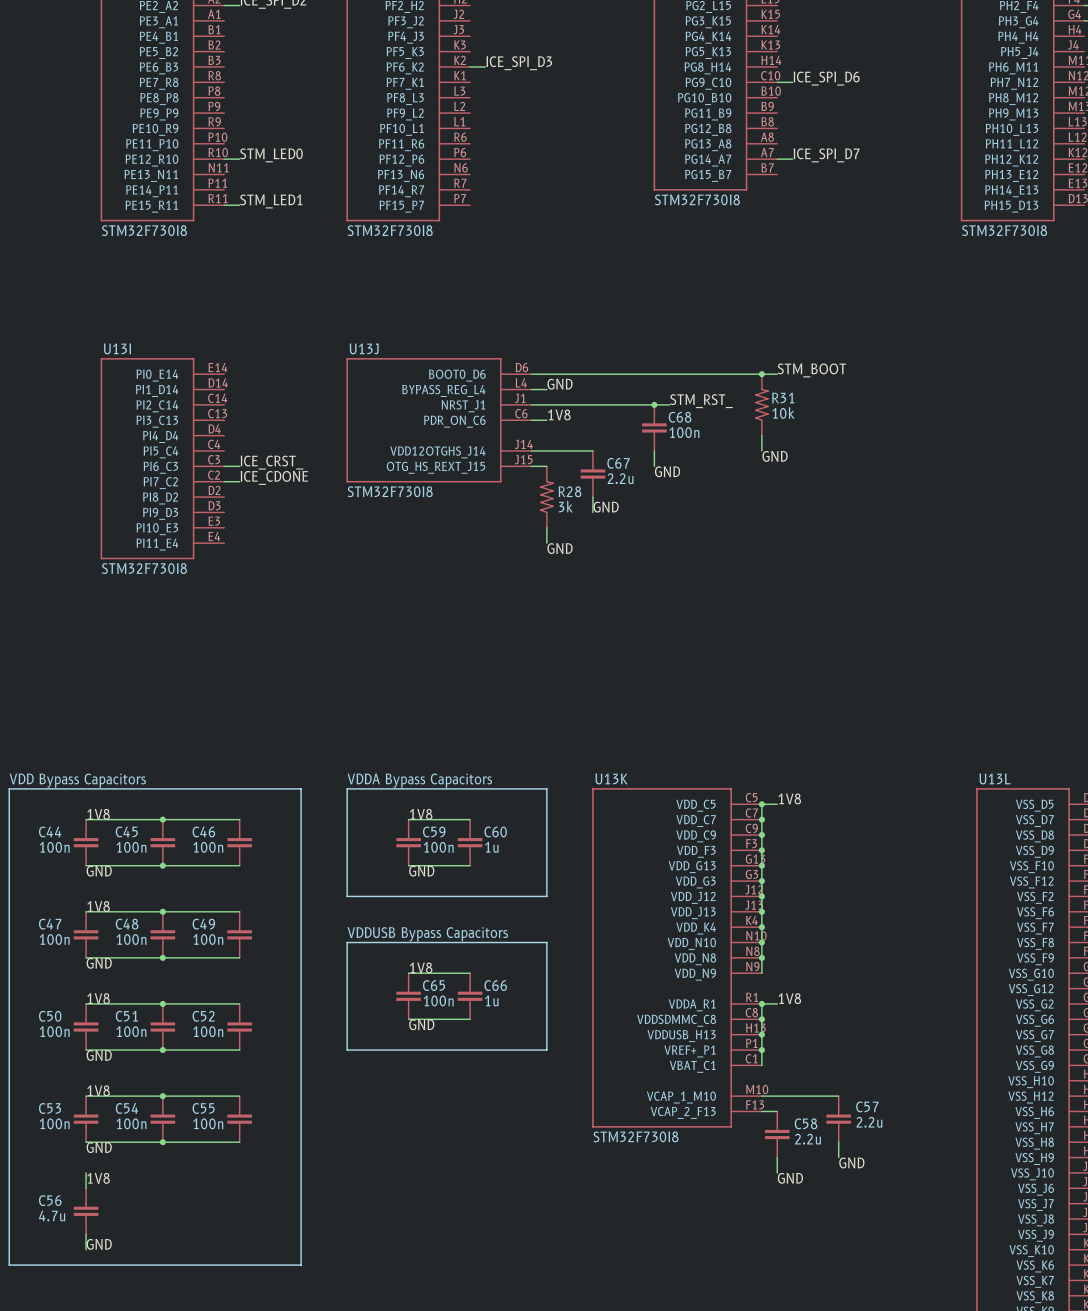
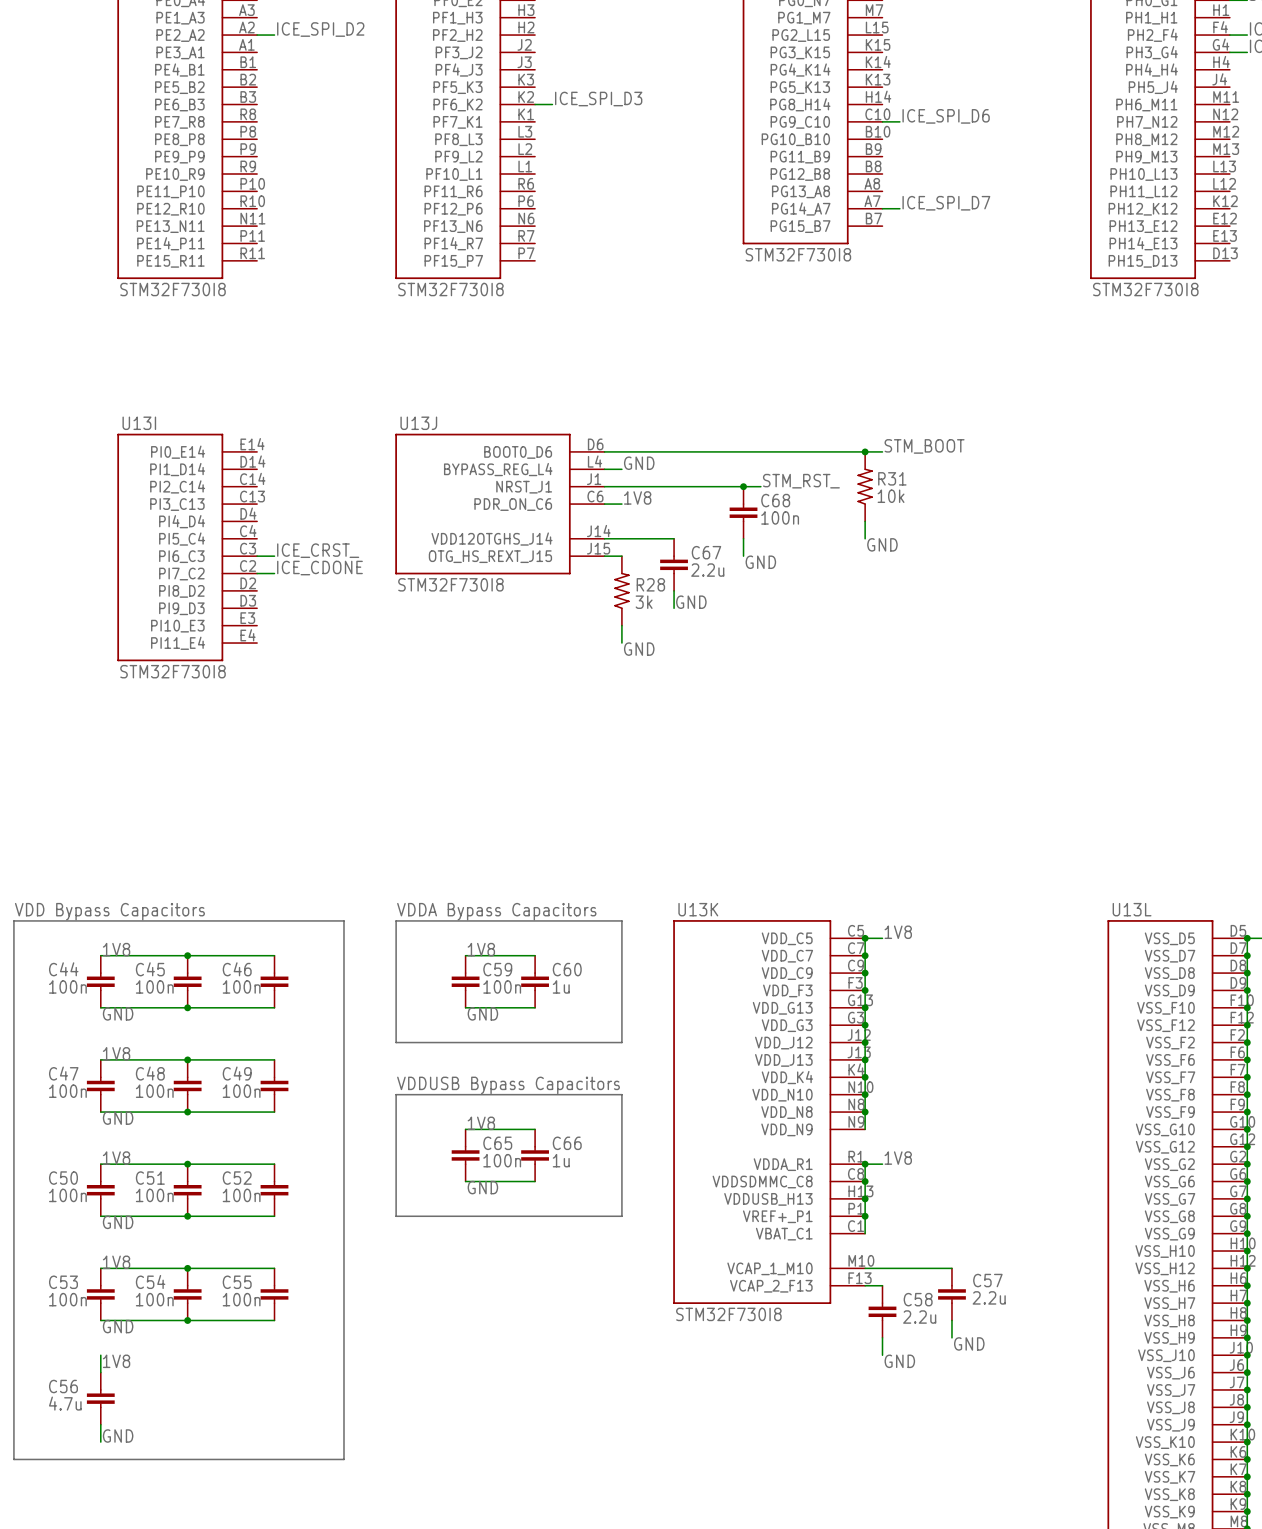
label: STM_LED0 (271, 155) -> none
wire: (224, 159) (239, 159) -> none
label: STM_LED1 (271, 201) -> none
wire: (224, 205) (239, 205) -> none

